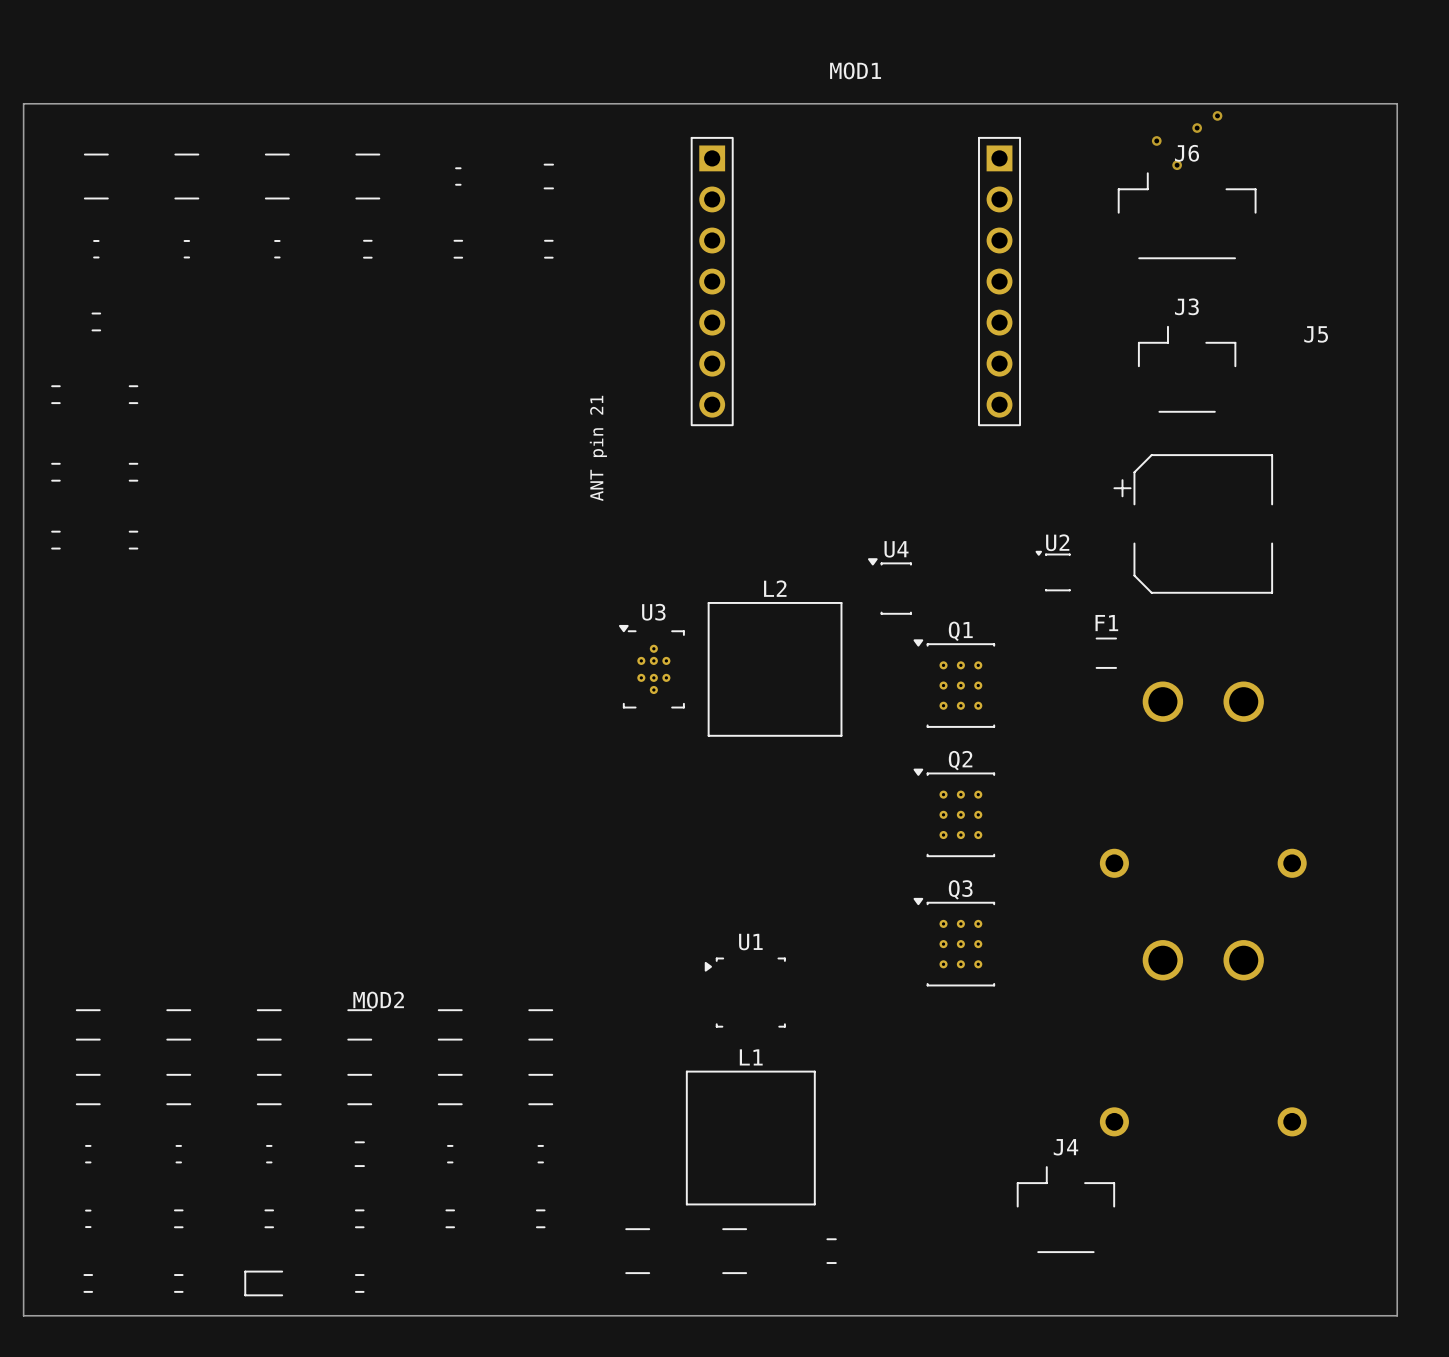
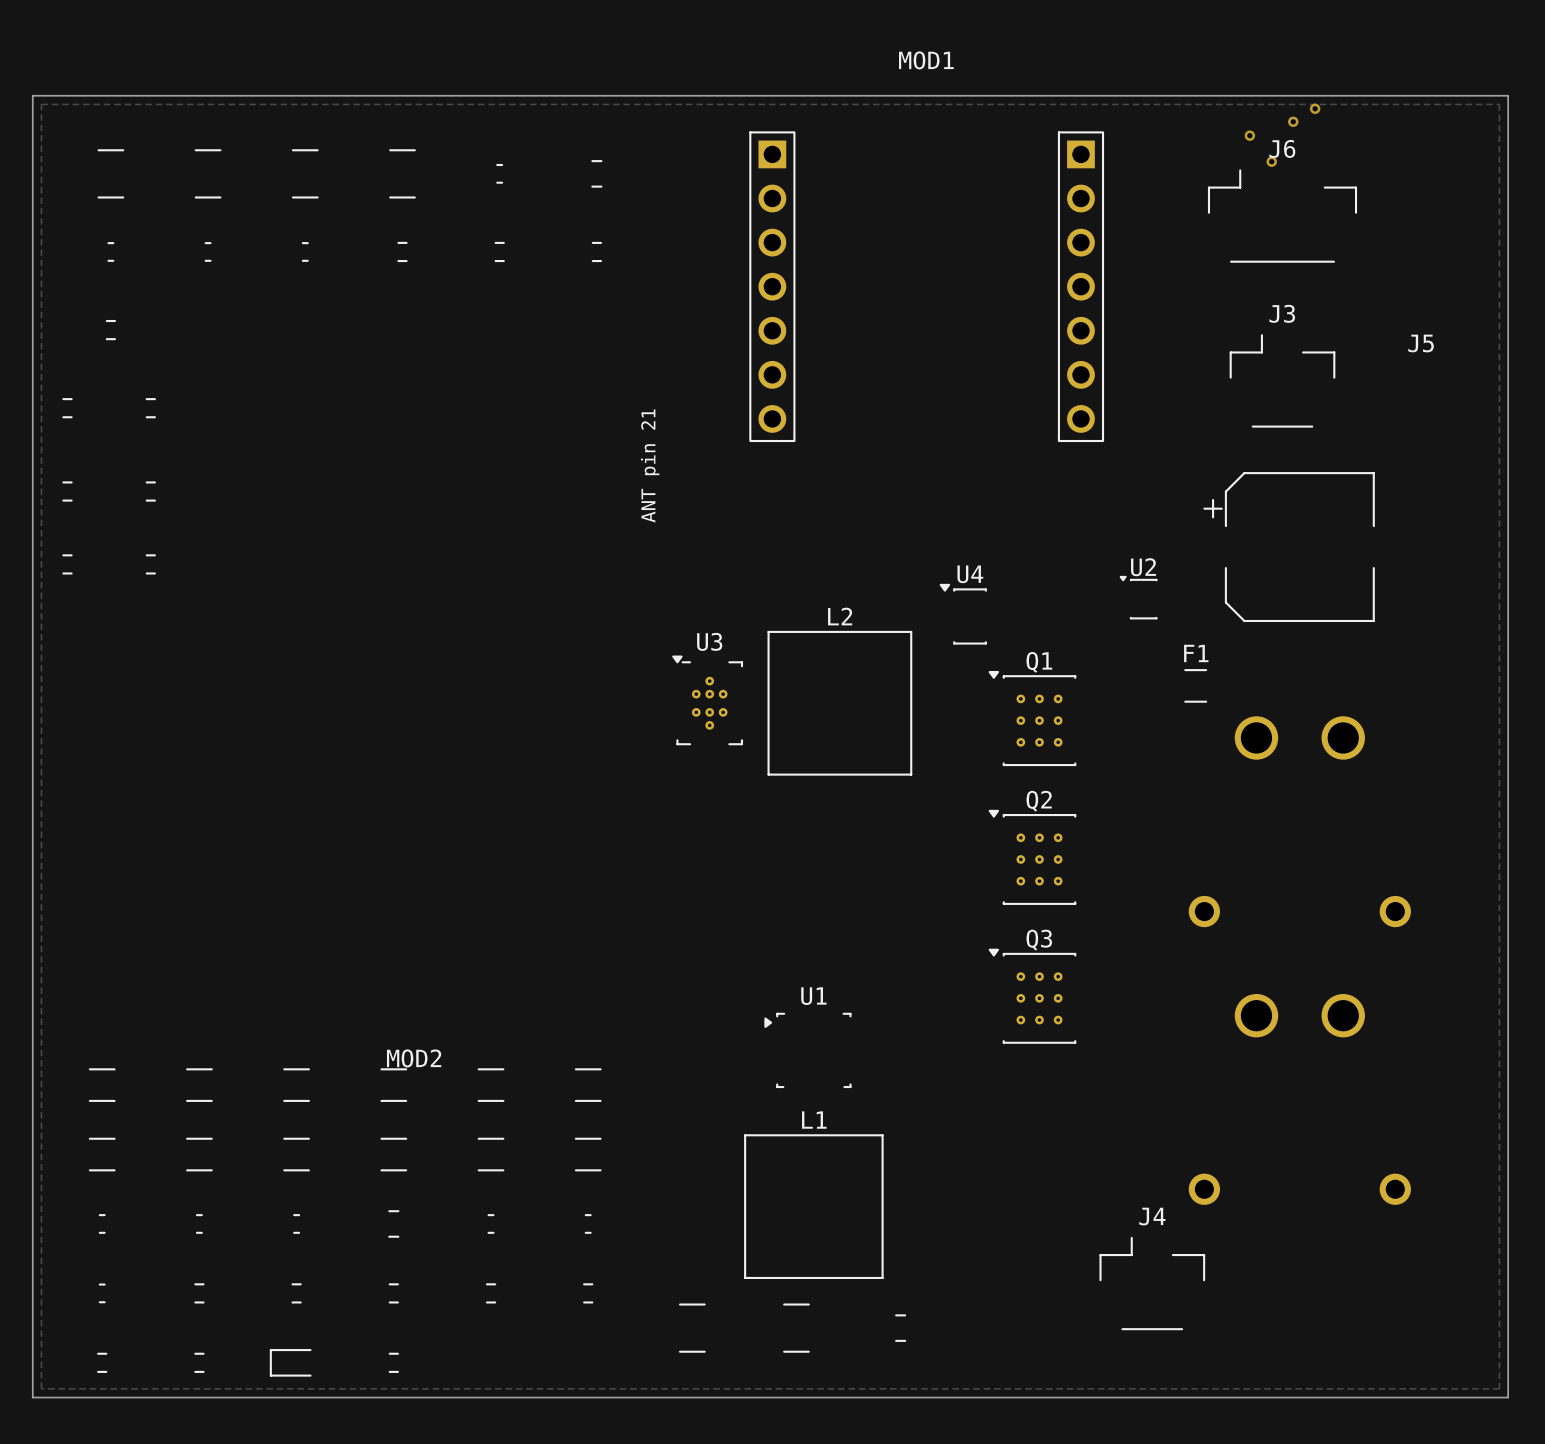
zone outline: none -> (41, 104) (1499, 104) (1499, 1388) (41, 1388) (41, 104)

